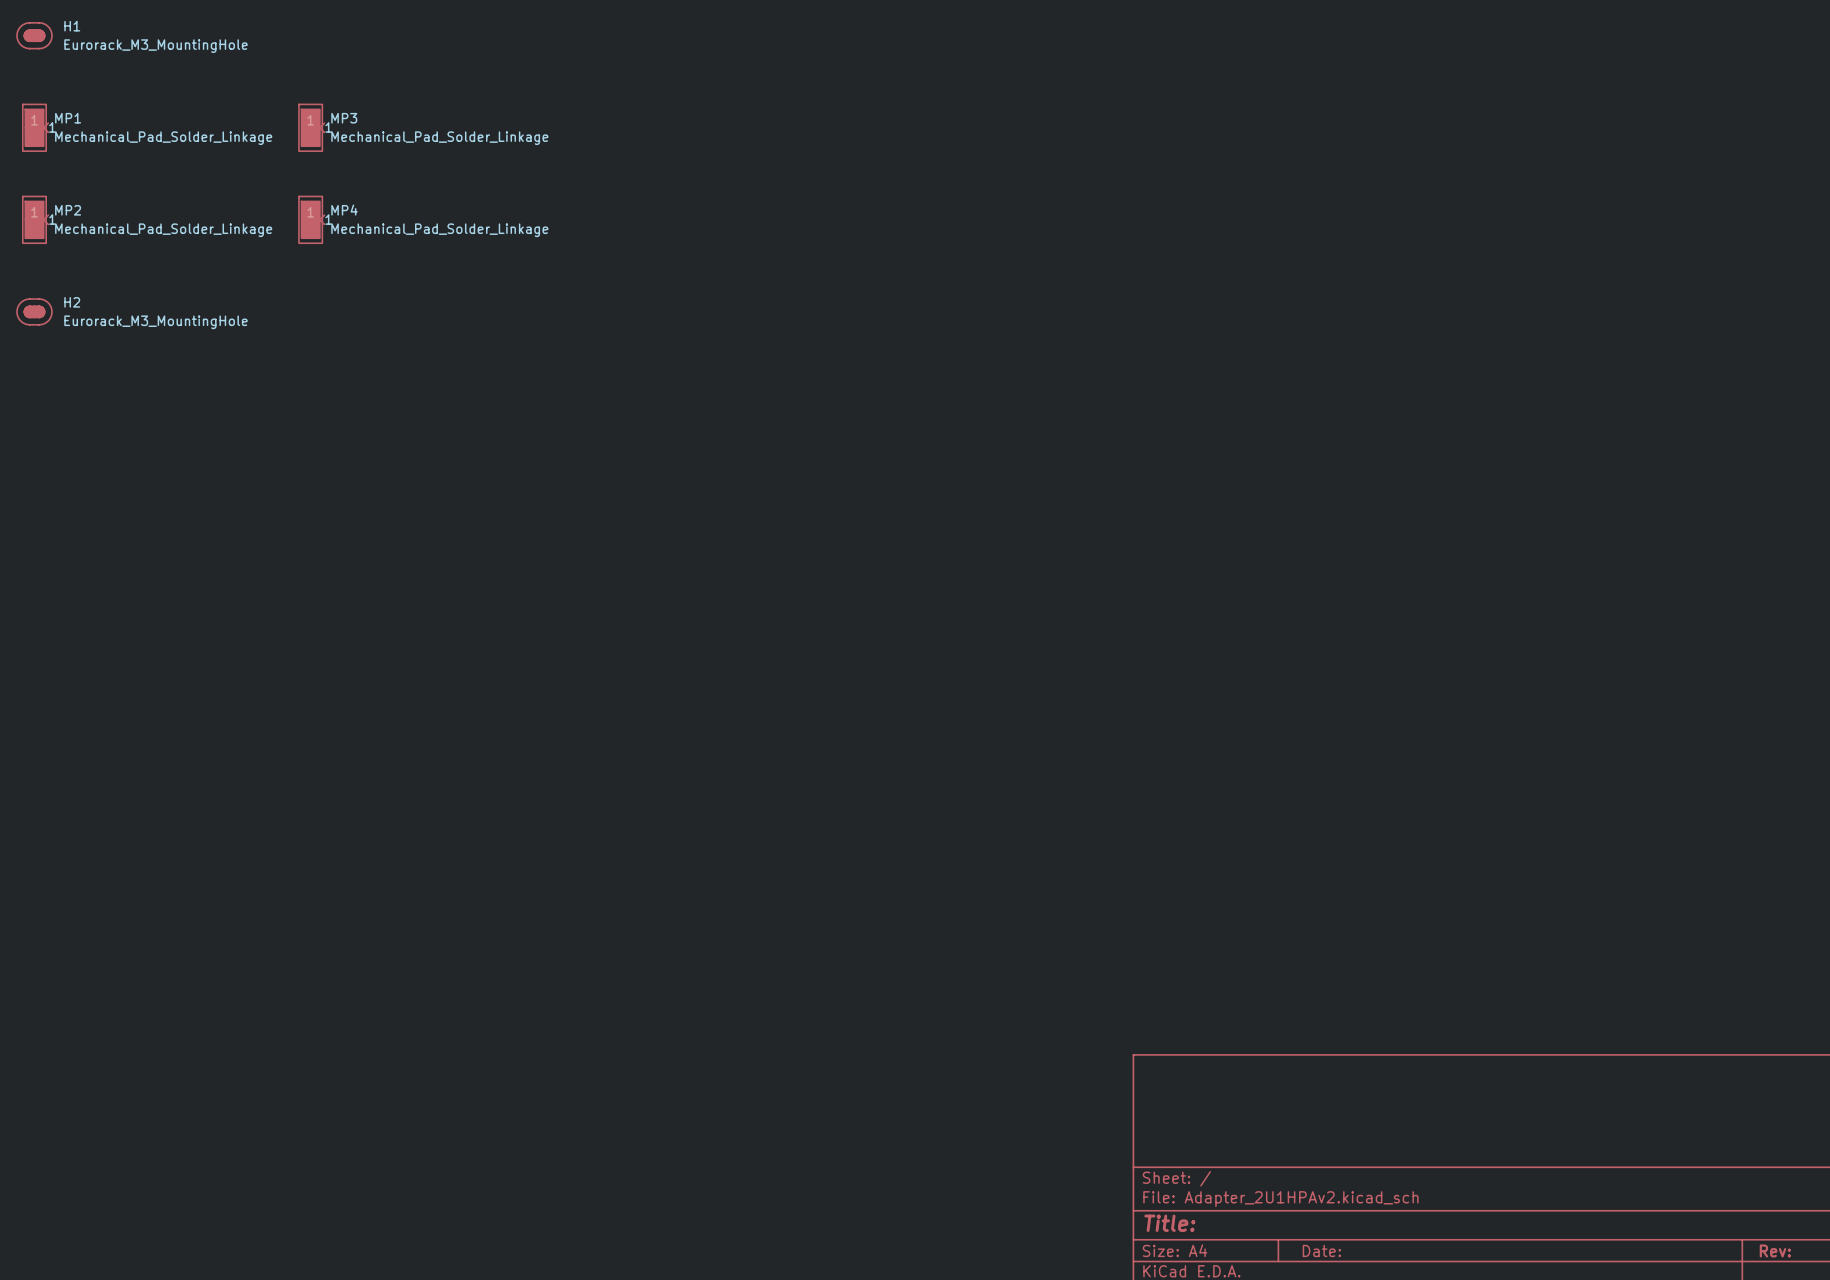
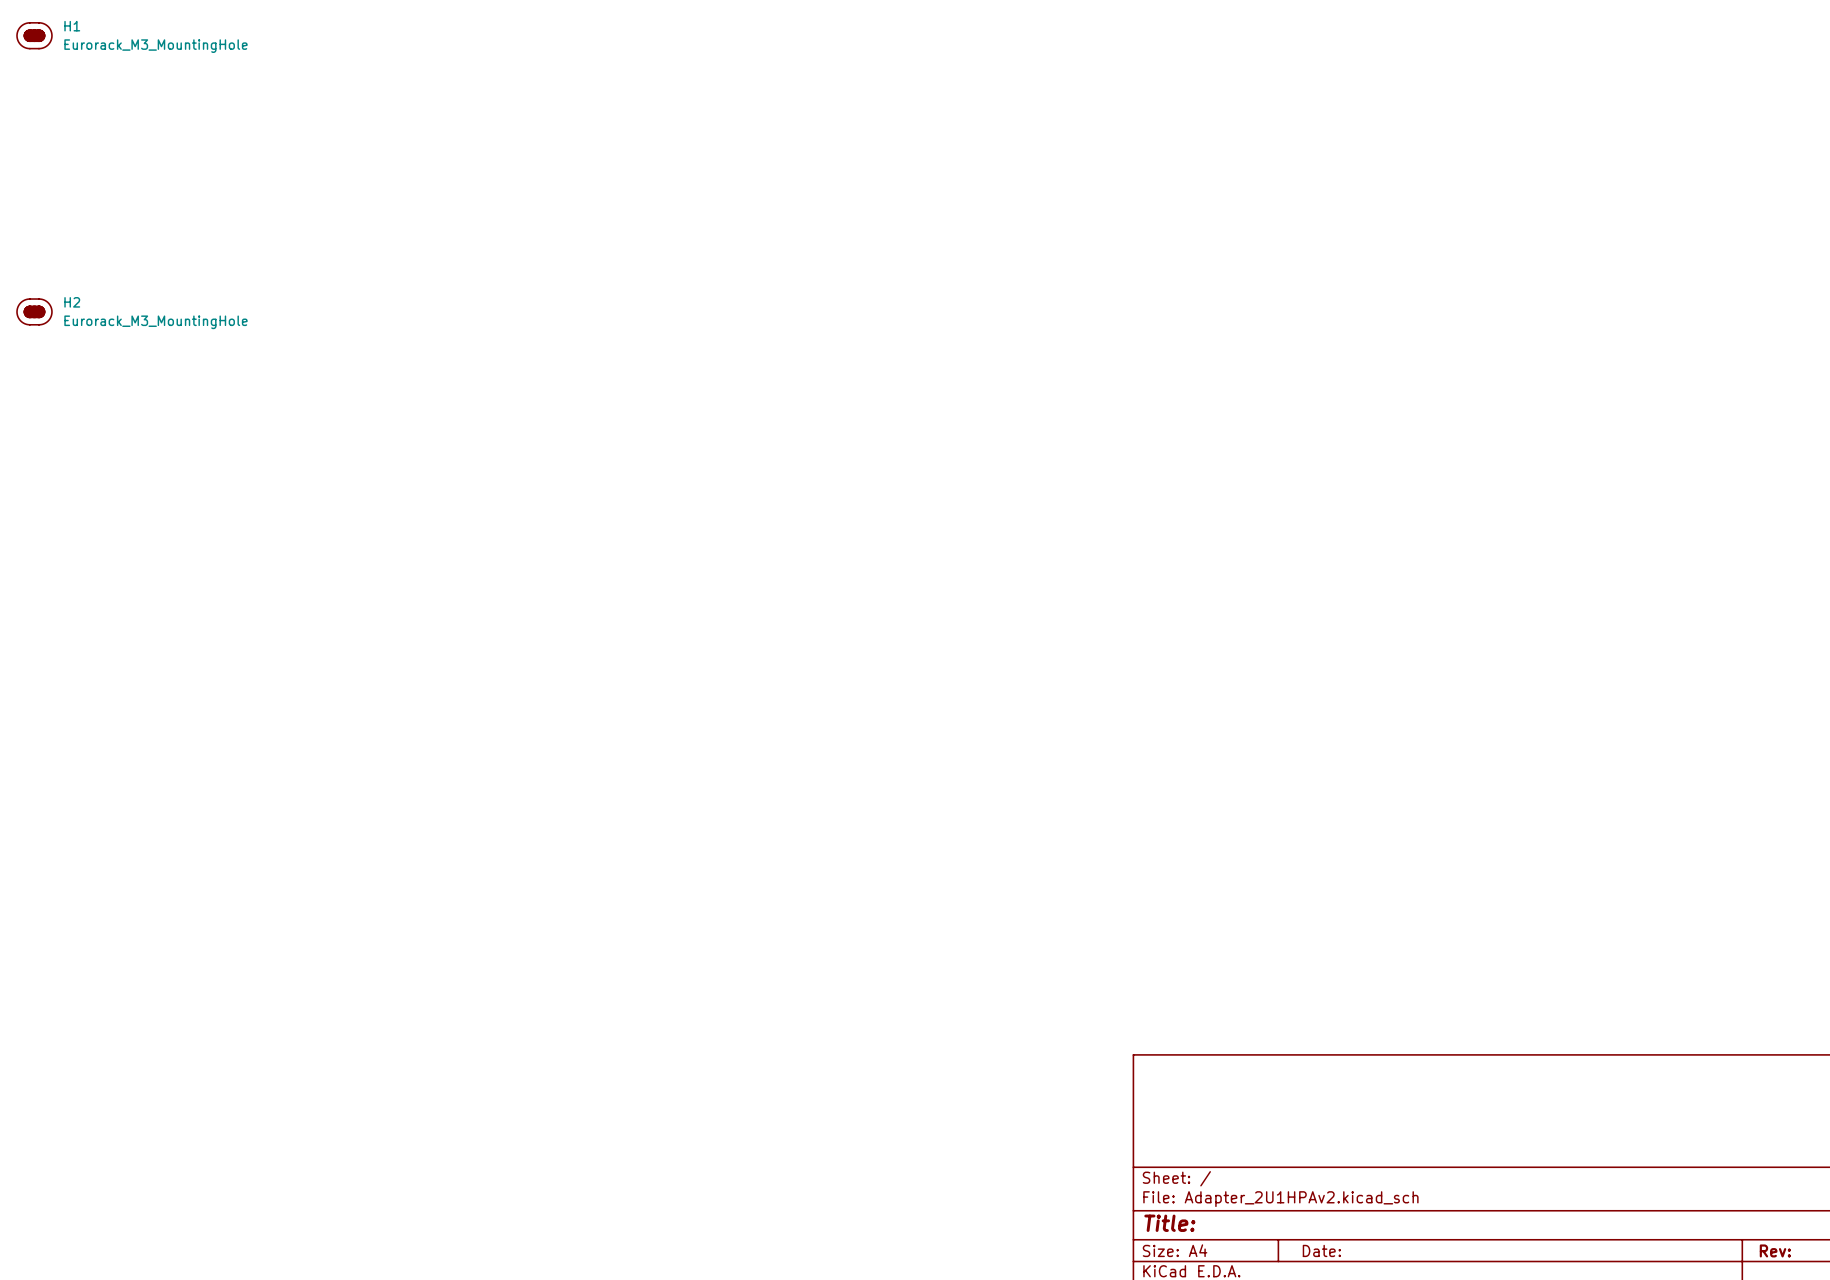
MP1: Mechanical_Pad_Solder_Linkage (35, 127) -> none
MP3: Mechanical_Pad_Solder_Linkage (311, 127) -> none
MP2: Mechanical_Pad_Solder_Linkage (35, 219) -> none
MP4: Mechanical_Pad_Solder_Linkage (311, 219) -> none

